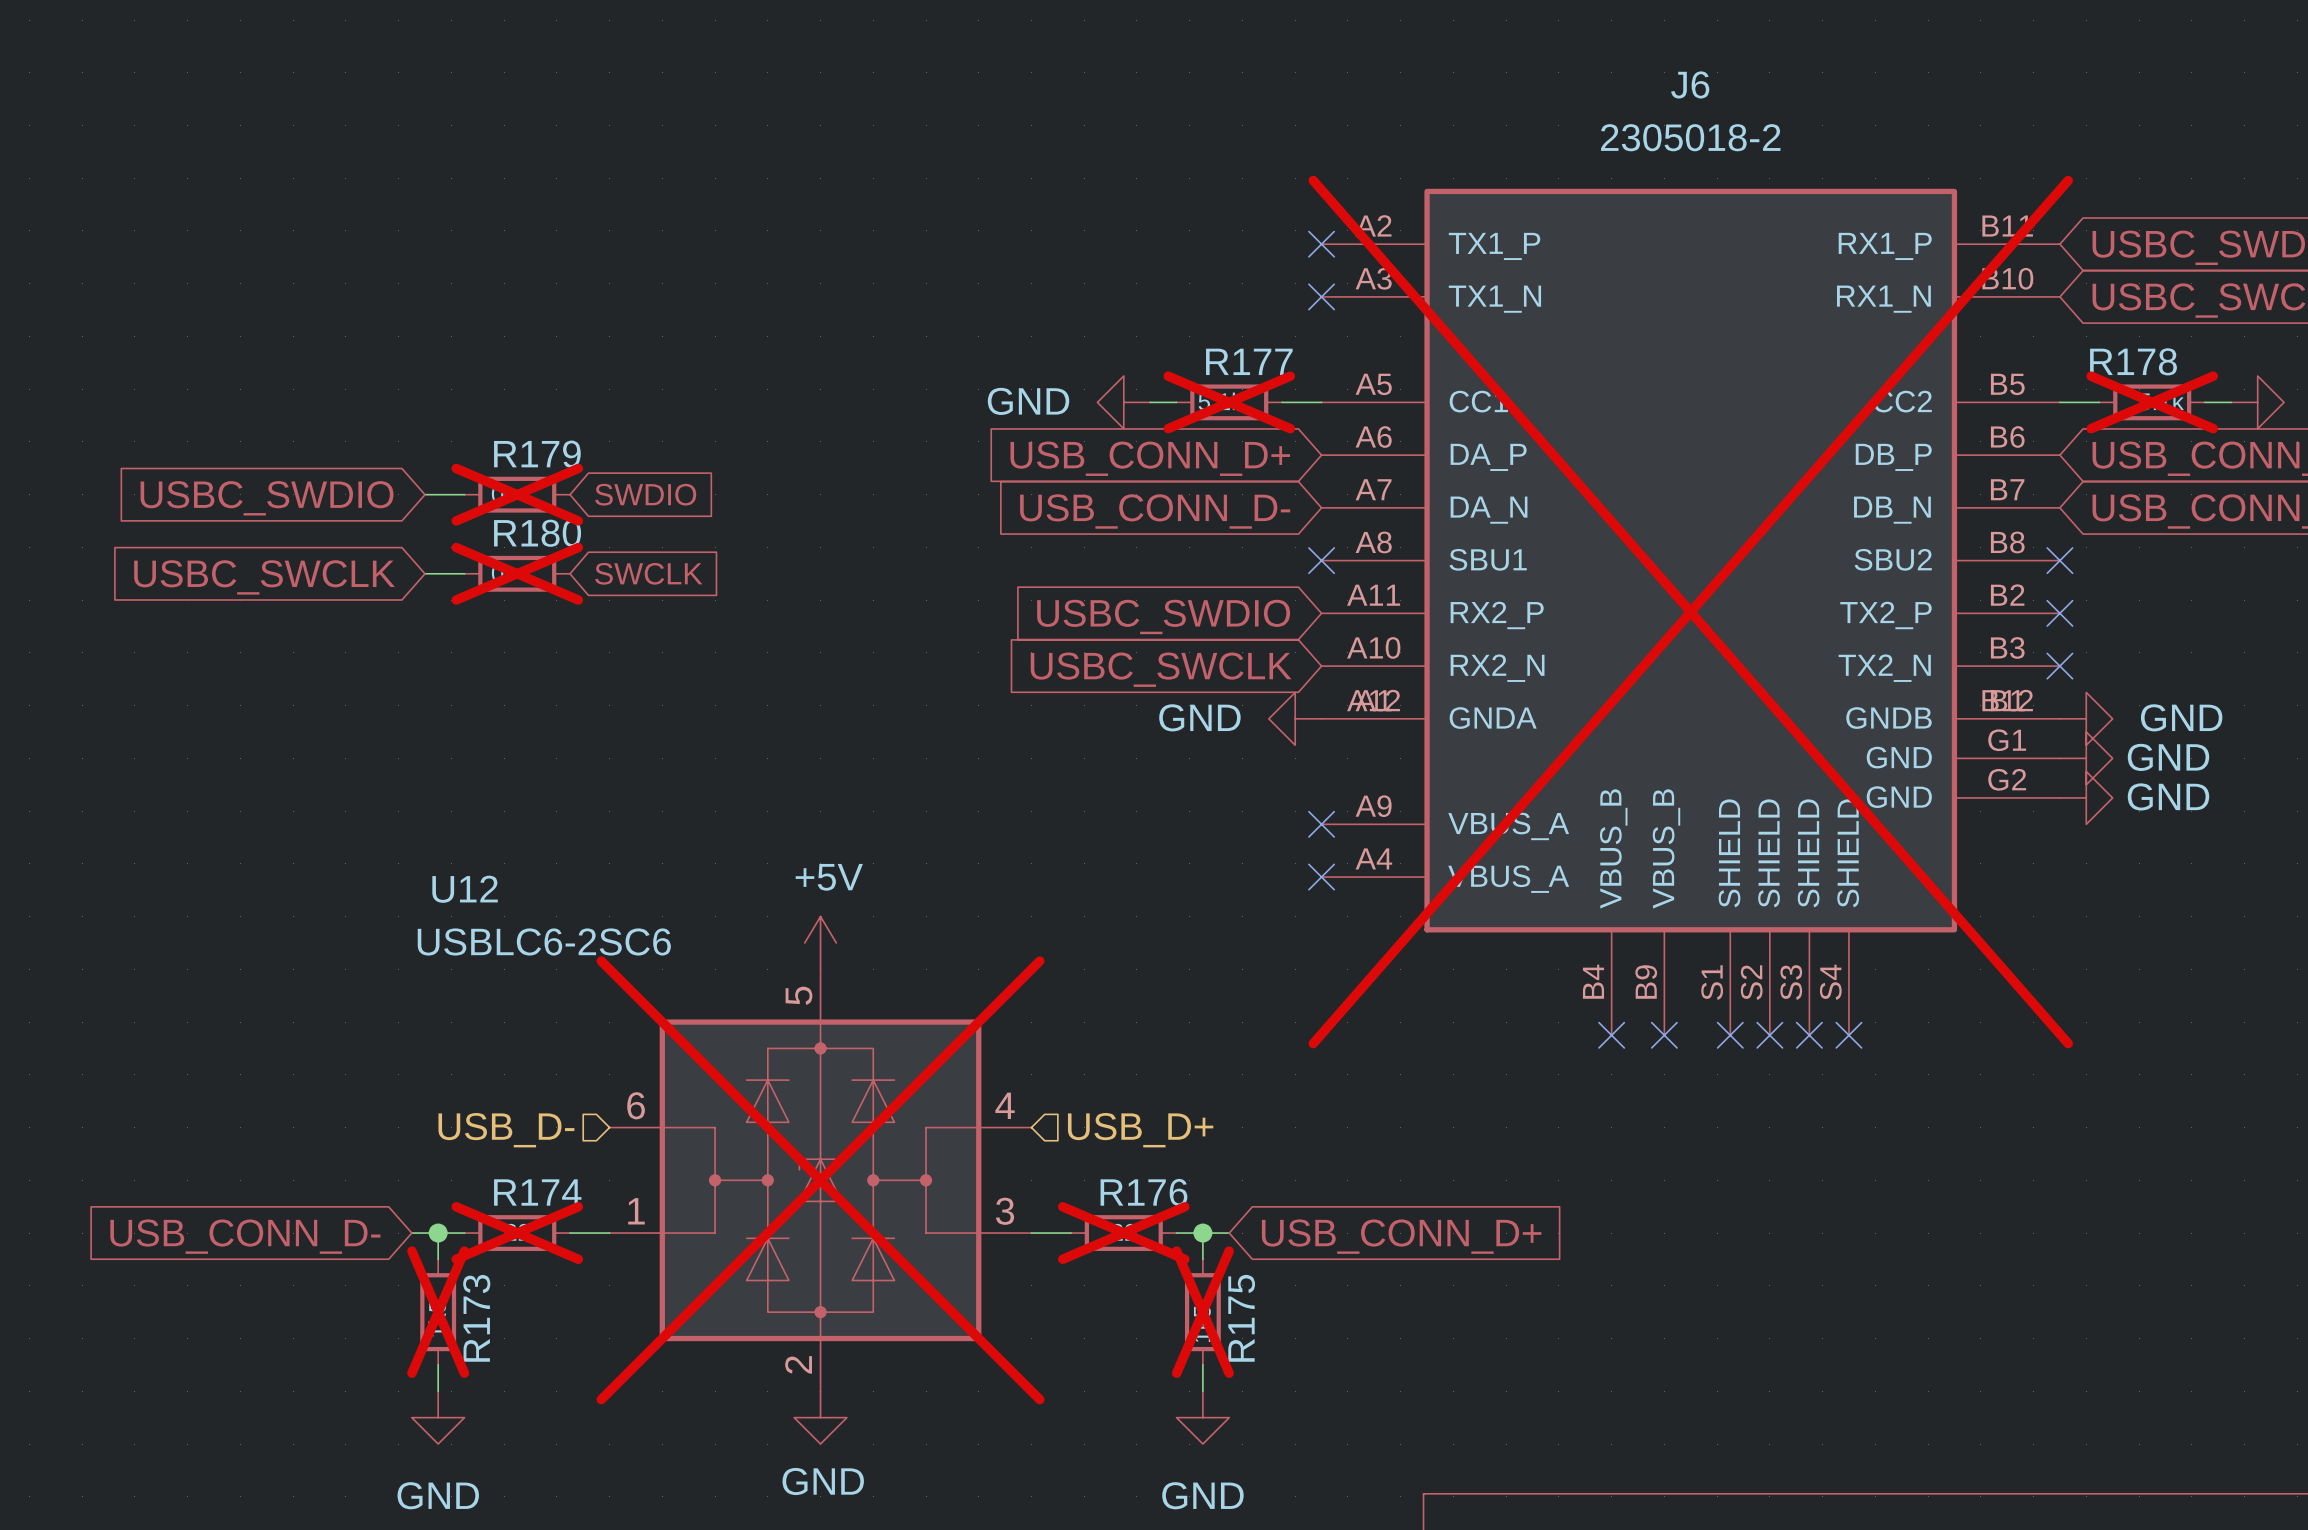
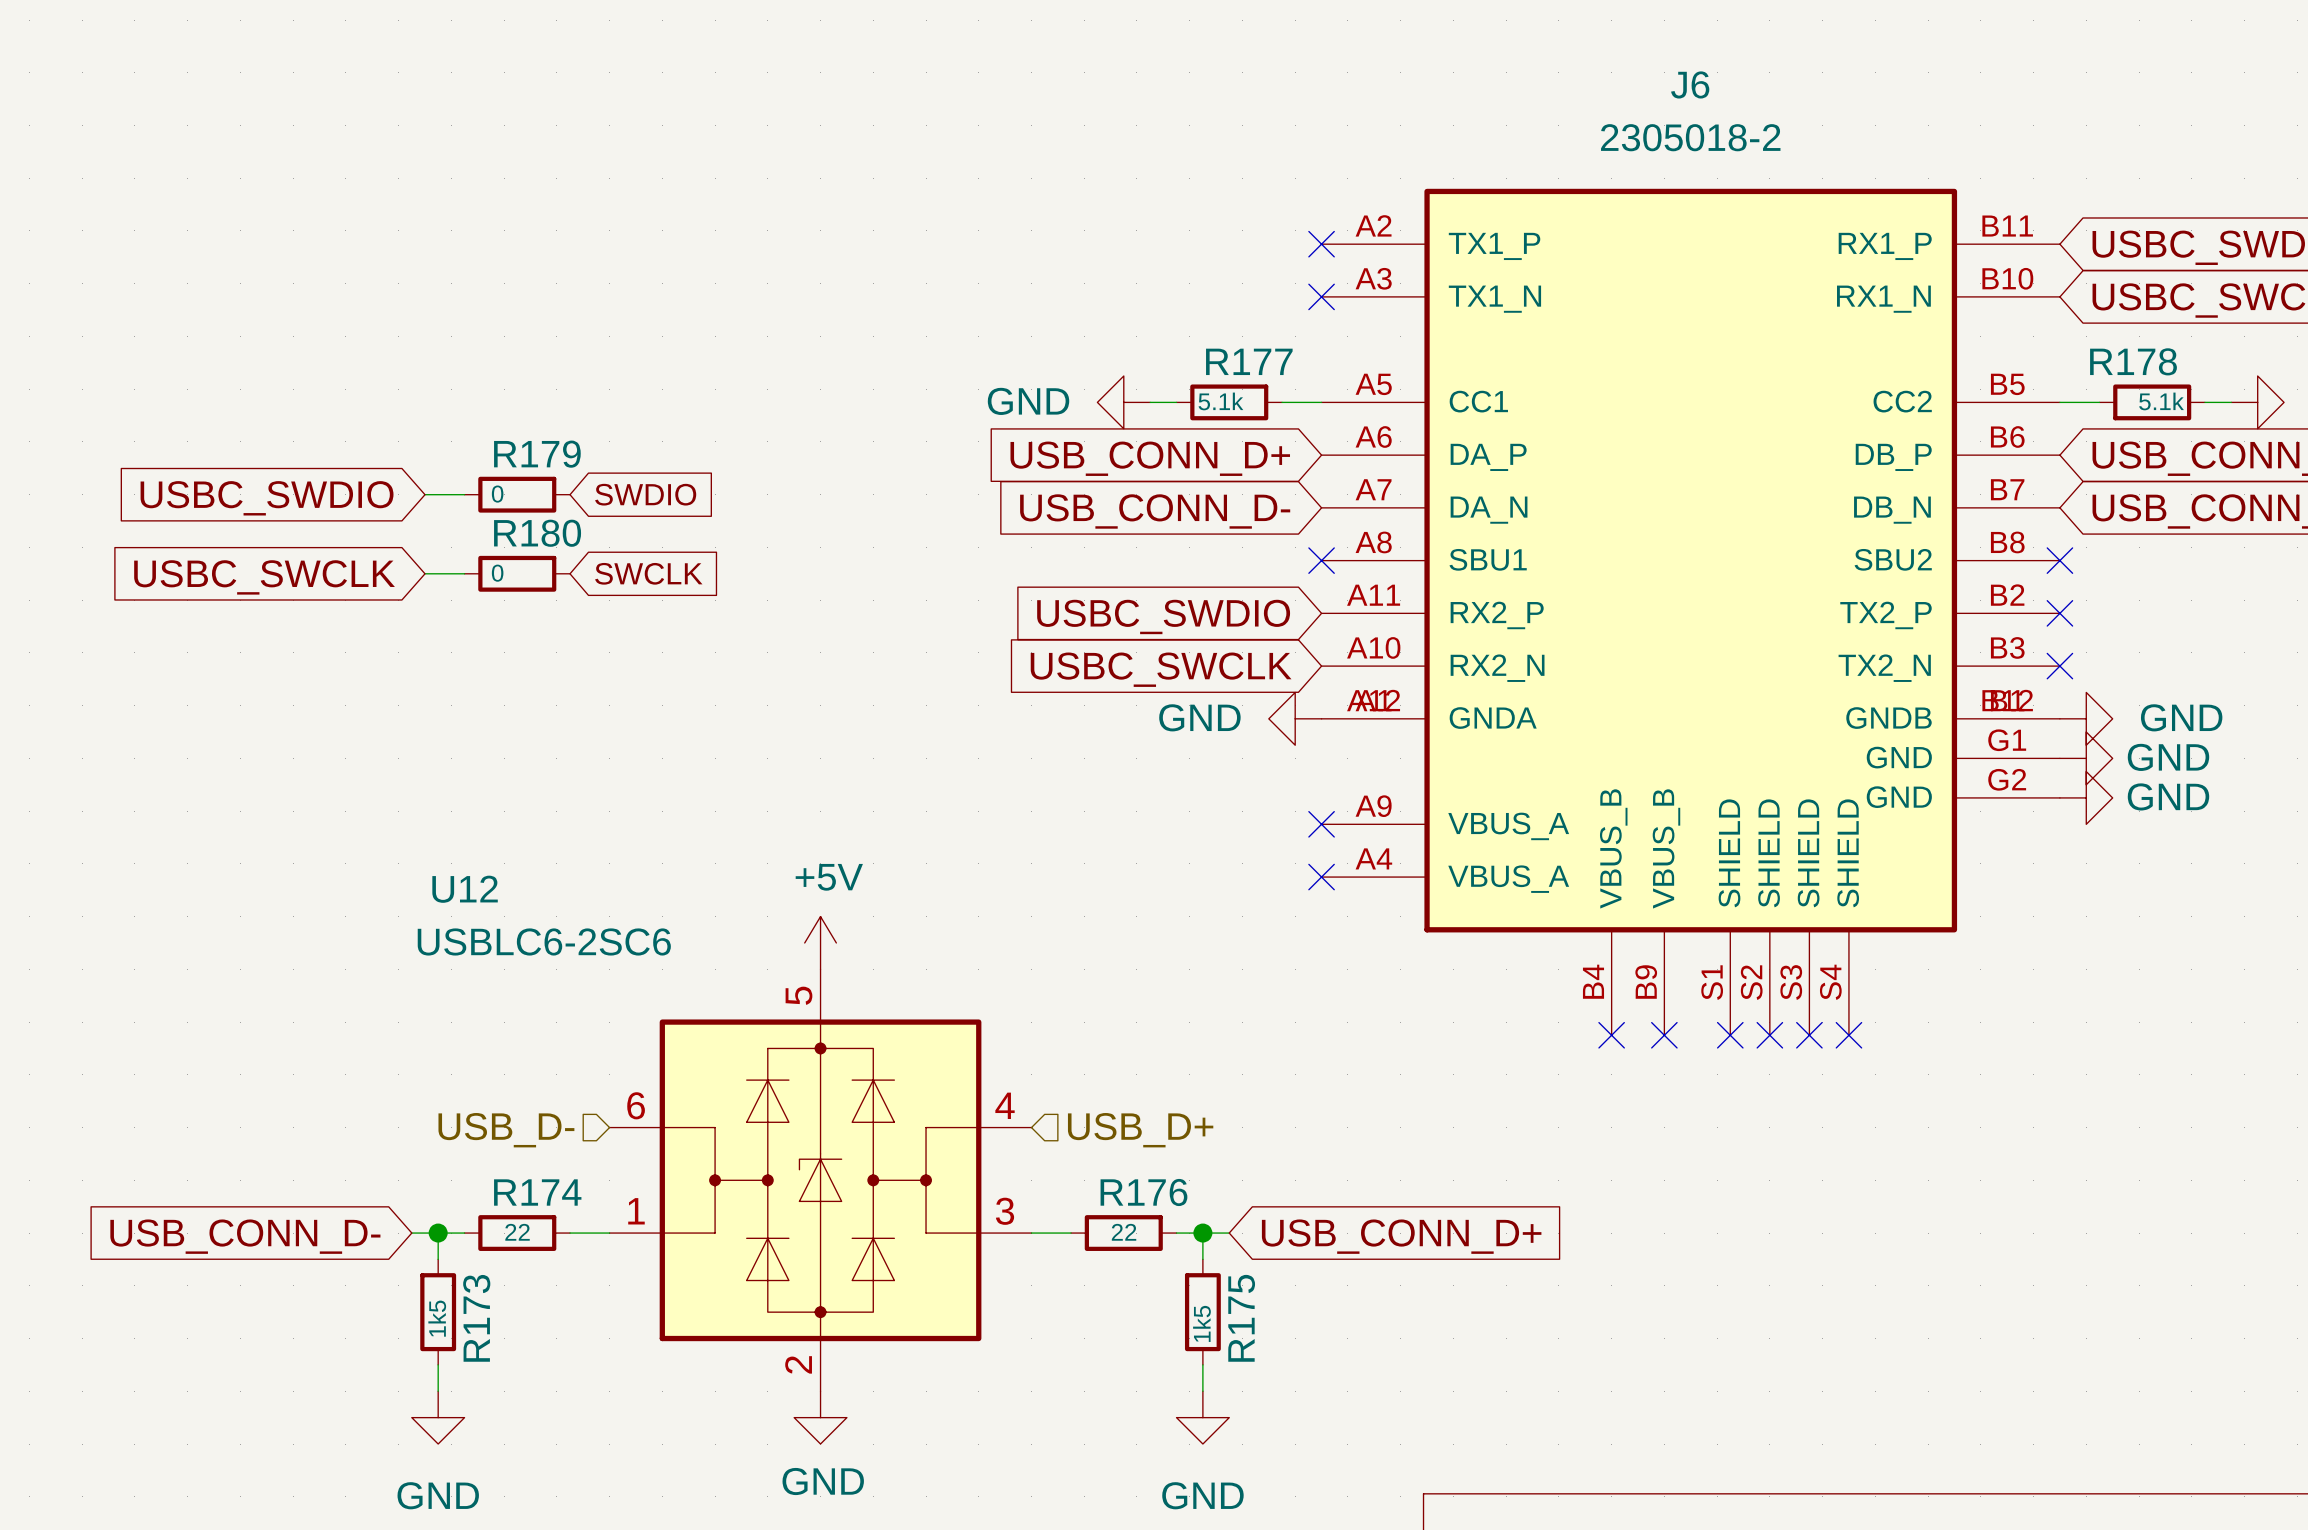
R177 do-not-place cross: (1229, 402) -> none
R178 do-not-place cross: (2152, 402) -> none
R179 do-not-place cross: (517, 494) -> none
R180 do-not-place cross: (517, 573) -> none
J6 do-not-place cross: (1690, 612) -> none
U12 do-not-place cross: (820, 1180) -> none
R174 do-not-place cross: (517, 1233) -> none
R176 do-not-place cross: (1123, 1233) -> none
R173 do-not-place cross: (438, 1312) -> none
R175 do-not-place cross: (1202, 1312) -> none

